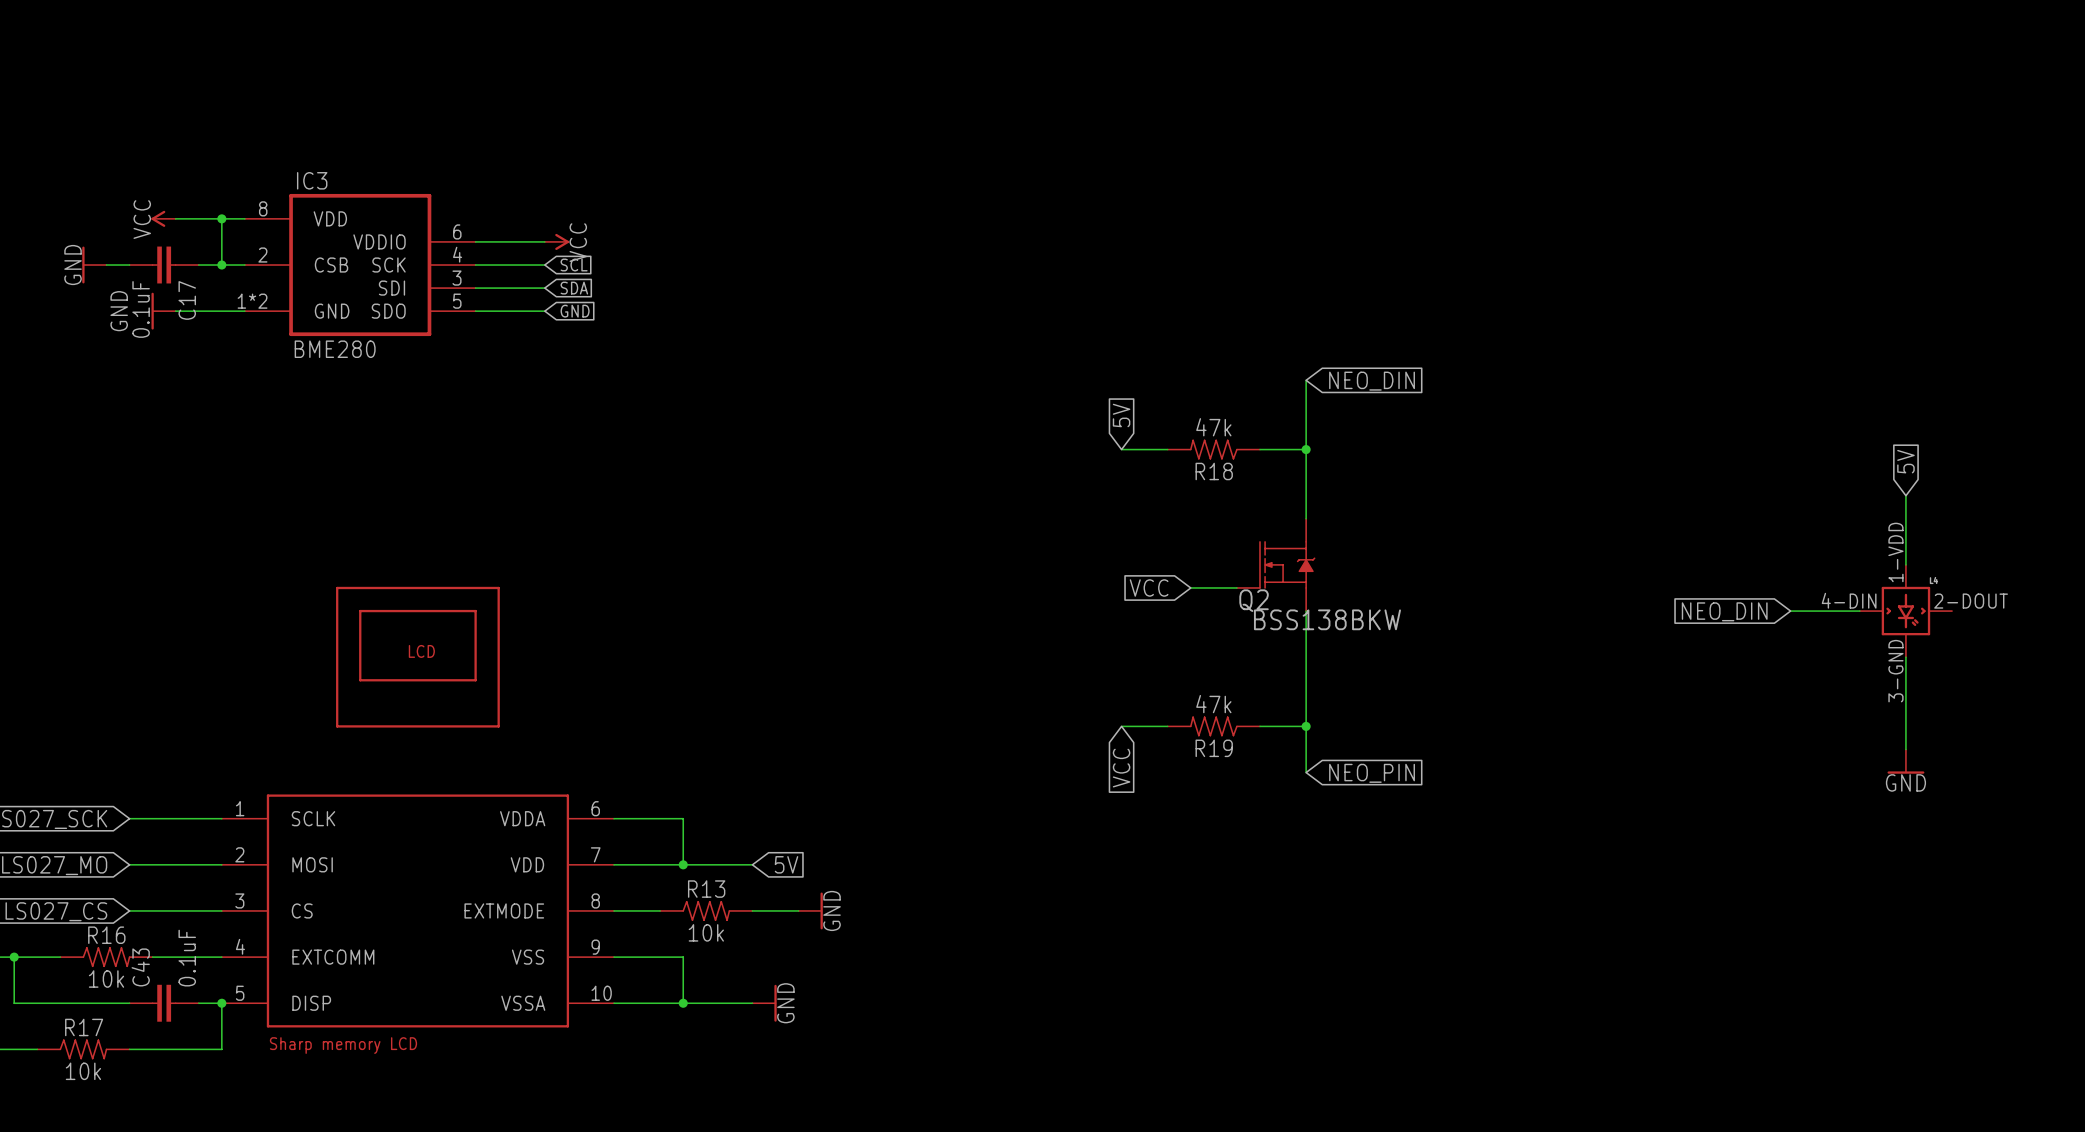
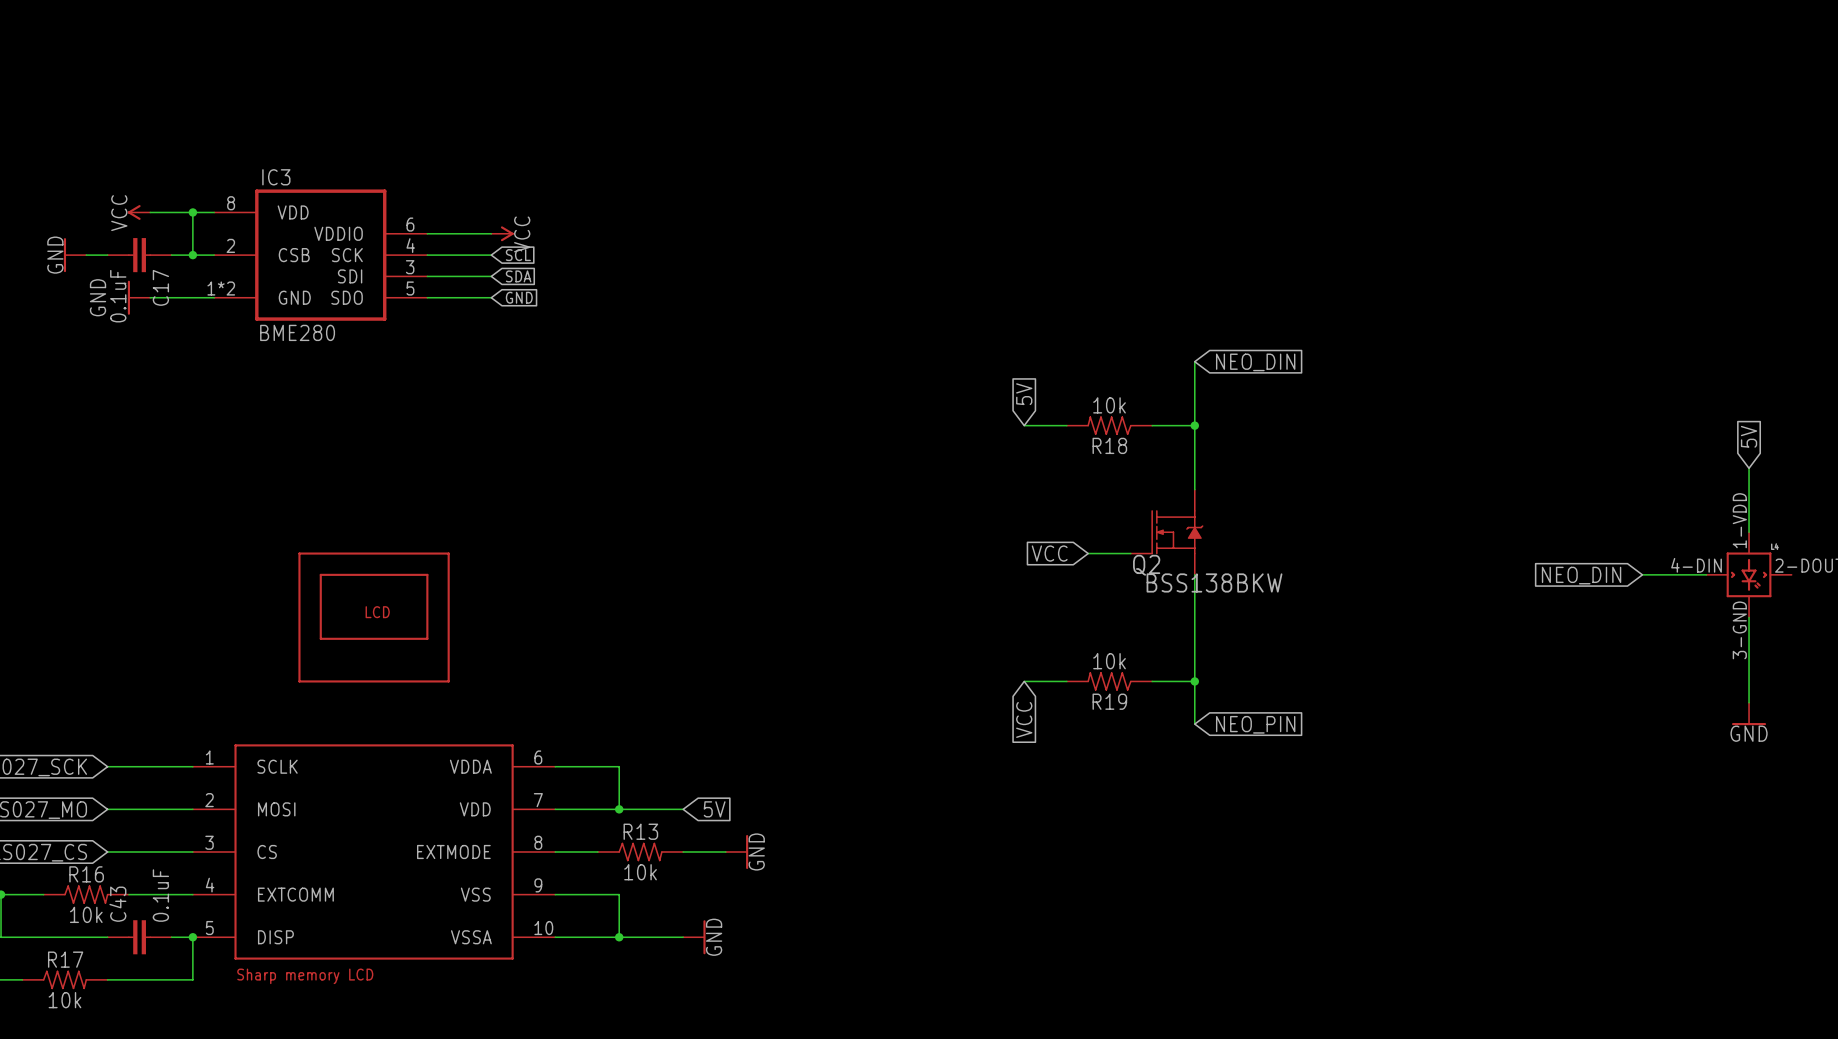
R18 value: 47k (1213, 427) -> 10k (1109, 405)
R19 value: 47k (1213, 704) -> 10k (1109, 661)

